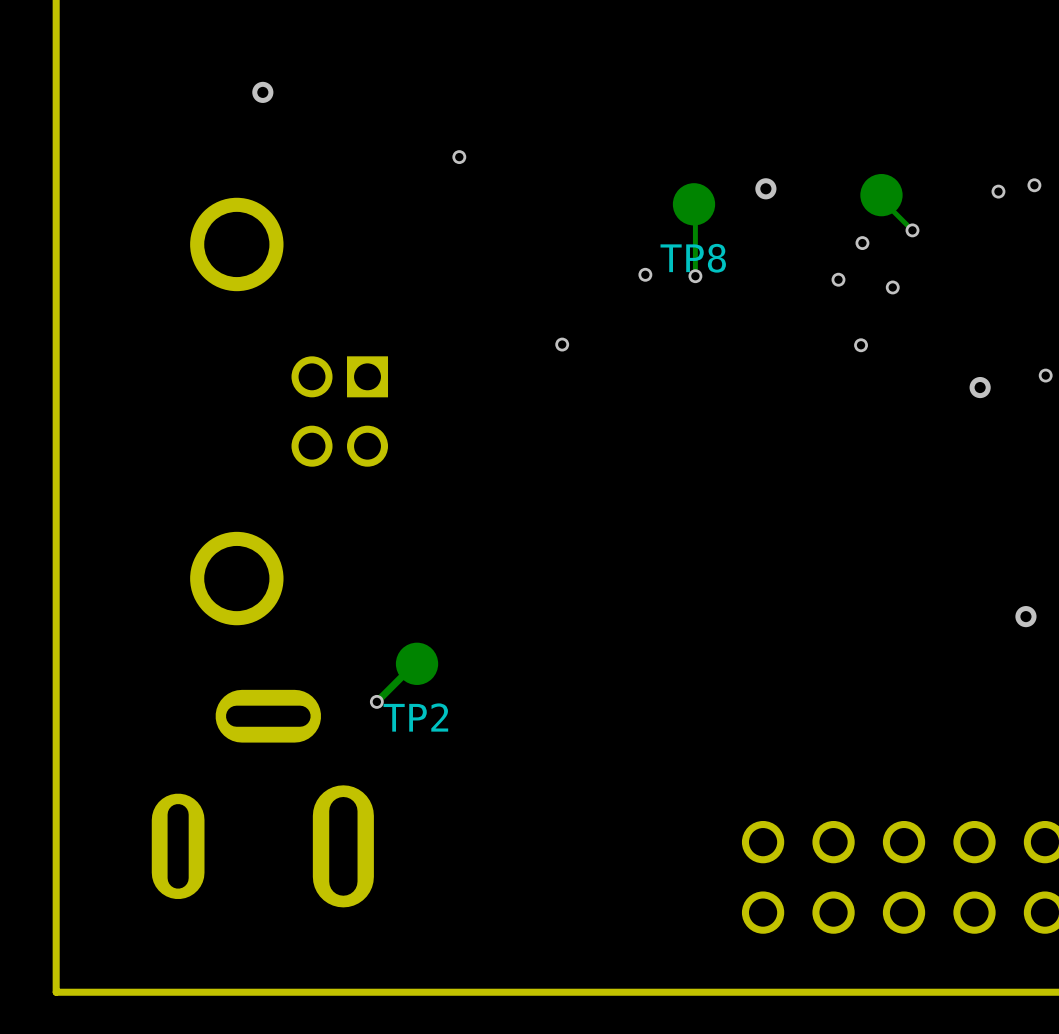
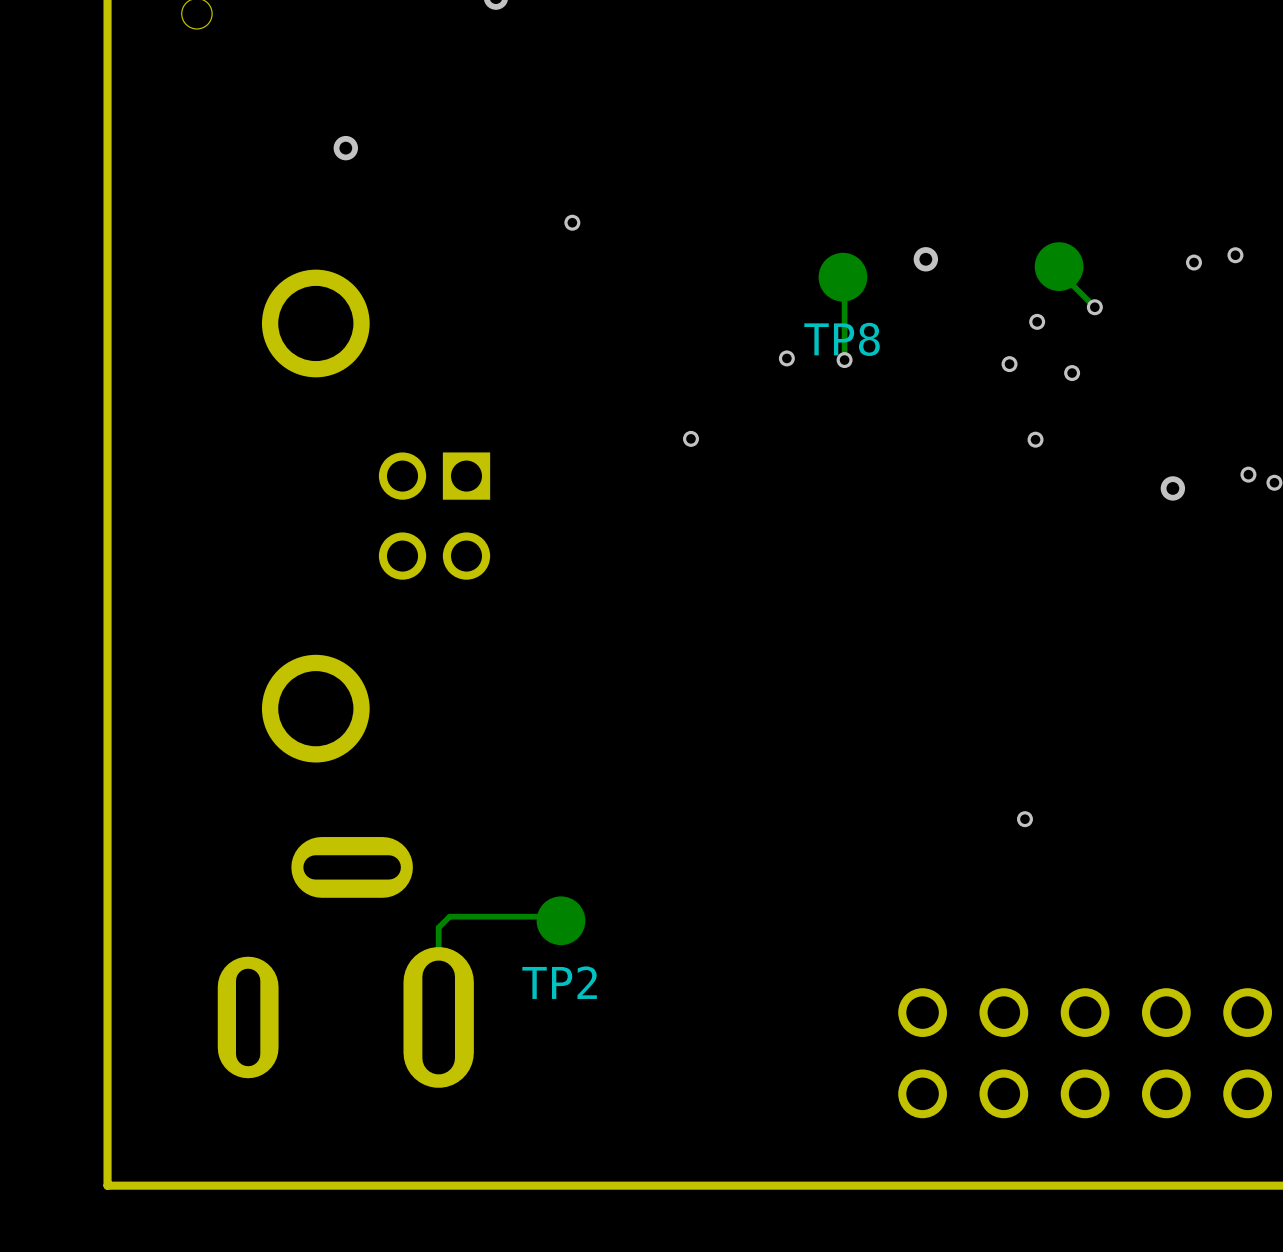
via: (1025, 616) -> none
TP2 position: (417, 663) -> (560, 920)
track: (413, 665) (376, 701) -> none
via: none -> (1024, 819)
via: (376, 701) -> none
track: none -> (569, 916) (449, 916) (438, 927) (438, 1017)

